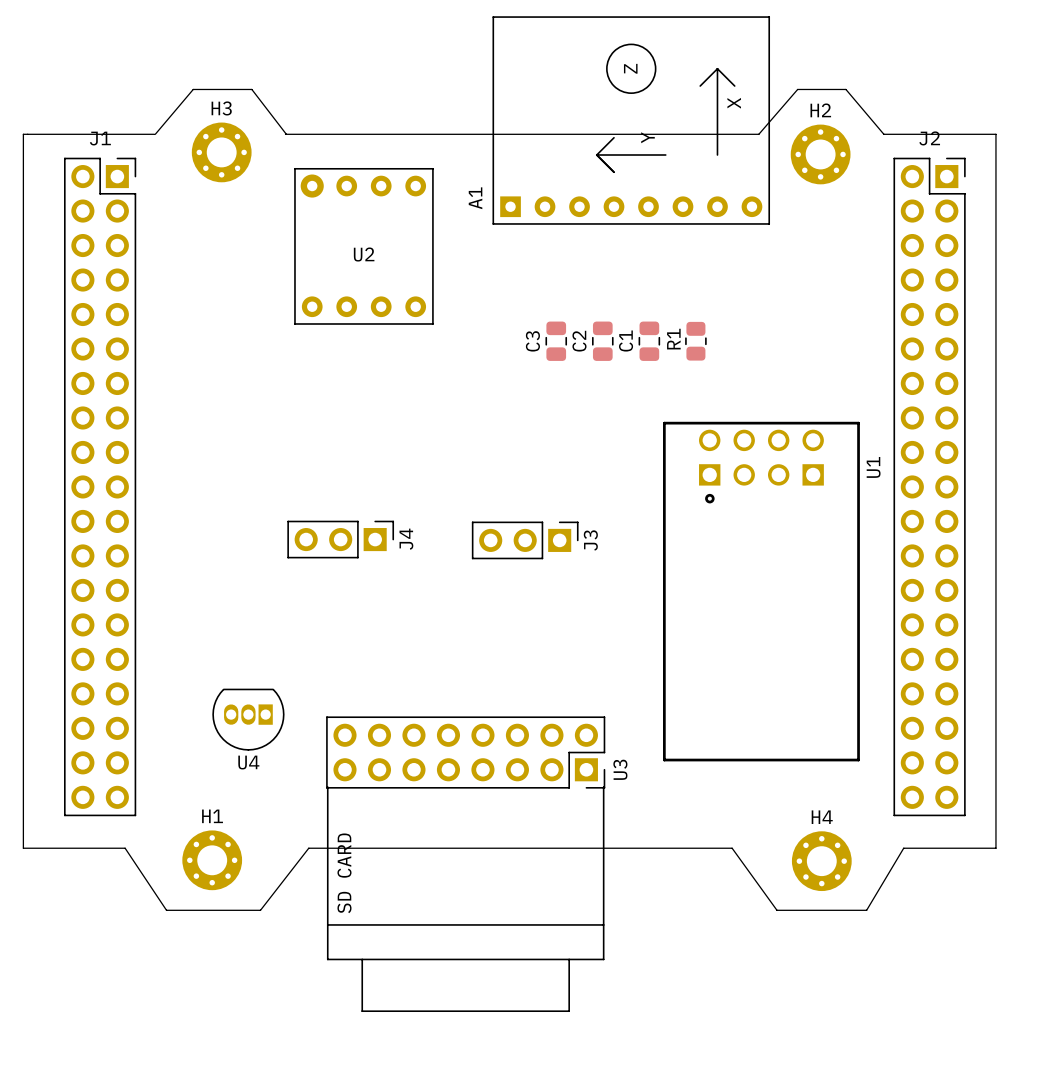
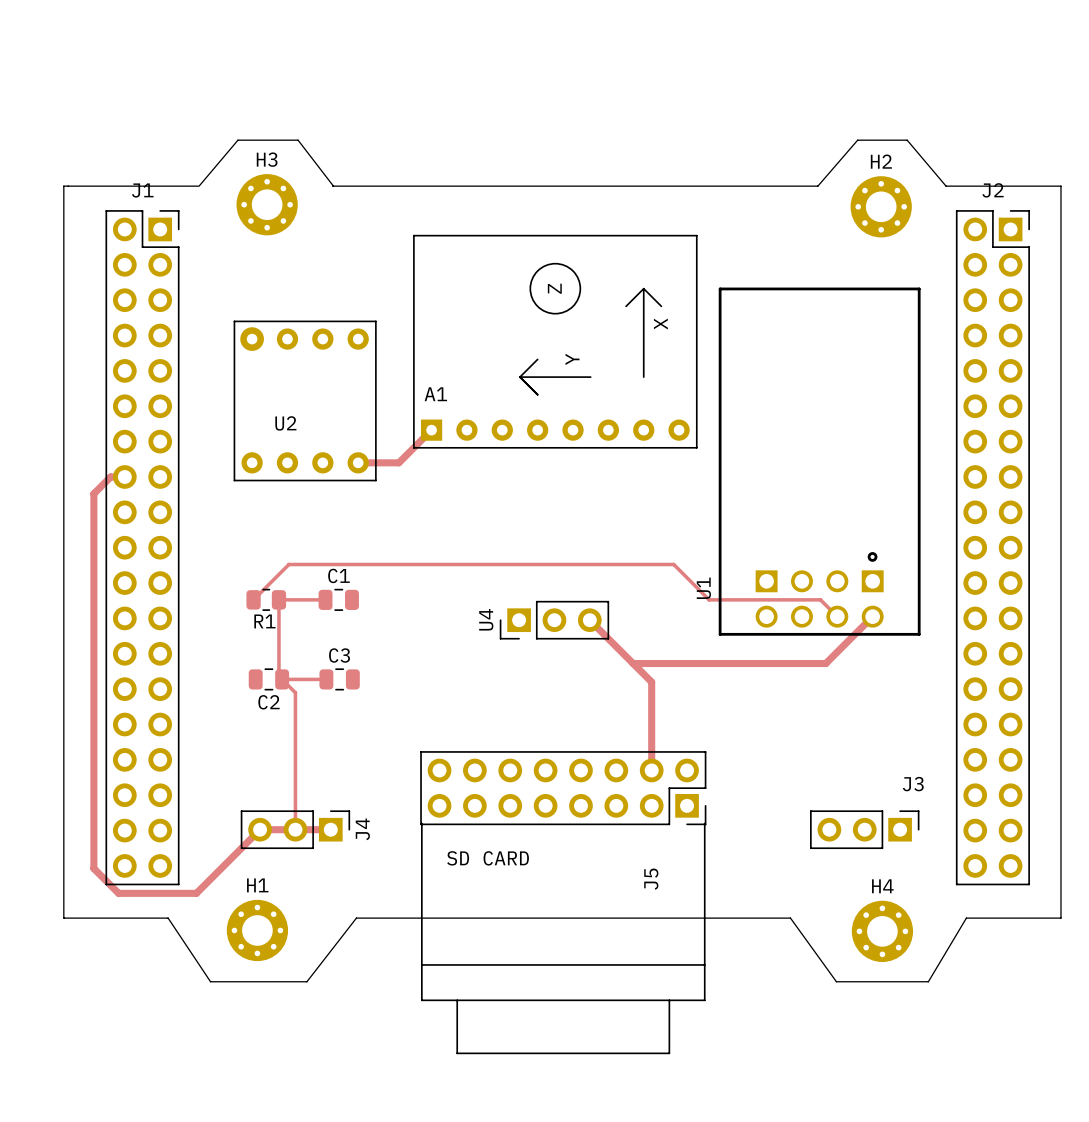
A1 position: (631, 120) -> (555, 341)
A1 name rotation: 0° (475, 198) -> 90° clockwise (435, 394)
A1 name position: A1 (475, 198) -> A1 (435, 394)
U2 position: (363, 246) -> (305, 400)
U2 name position: U2 (364, 254) -> U2 (285, 423)
R1 name position: R1 (673, 339) -> R1 (264, 621)
C3 rotation: 0° (556, 341) -> 90° clockwise (339, 679)
C3 position: (556, 341) -> (339, 679)
C2 name position: C2 (579, 341) -> C2 (268, 702)
C2 rotation: 0° (602, 341) -> 90° clockwise (268, 679)
C2 position: (602, 341) -> (268, 679)
C1 rotation: 0° (649, 341) -> 90° clockwise (338, 599)
C1 position: (649, 341) -> (338, 599)
R1 rotation: 0° (695, 341) -> 90° clockwise (266, 599)
R1 position: (695, 341) -> (266, 599)
track: none -> (431, 430) (398, 462) (358, 462)
track: none -> (124, 476) (110, 476) (93, 493) (93, 868) (118, 893) (196, 893) (260, 829) (330, 829)
track: none -> (253, 599) (288, 564) (673, 564) (709, 599) (820, 599) (837, 616)
track: none -> (325, 599) (278, 599) (278, 676) (295, 692) (295, 829)
J4 position: (340, 539) -> (295, 829)
J3 position: (525, 540) -> (864, 829)
J3 name rotation: 0° (590, 540) -> 90° clockwise (913, 784)
J3 name position: J3 (590, 540) -> J3 (913, 784)
track: none -> (872, 616) (825, 663) (633, 663)
track: none -> (589, 620) (651, 682) (651, 770)
U1 rotation: 0° (761, 591) -> 180° (819, 461)
track: none -> (282, 679) (326, 679)
U4 footprint: [212, 688, 285, 751] -> [499, 600, 610, 640]
U4 name position: U4 (248, 762) -> U4 (486, 619)
J5: none -> (563, 902)
U3: (465, 864) -> none

